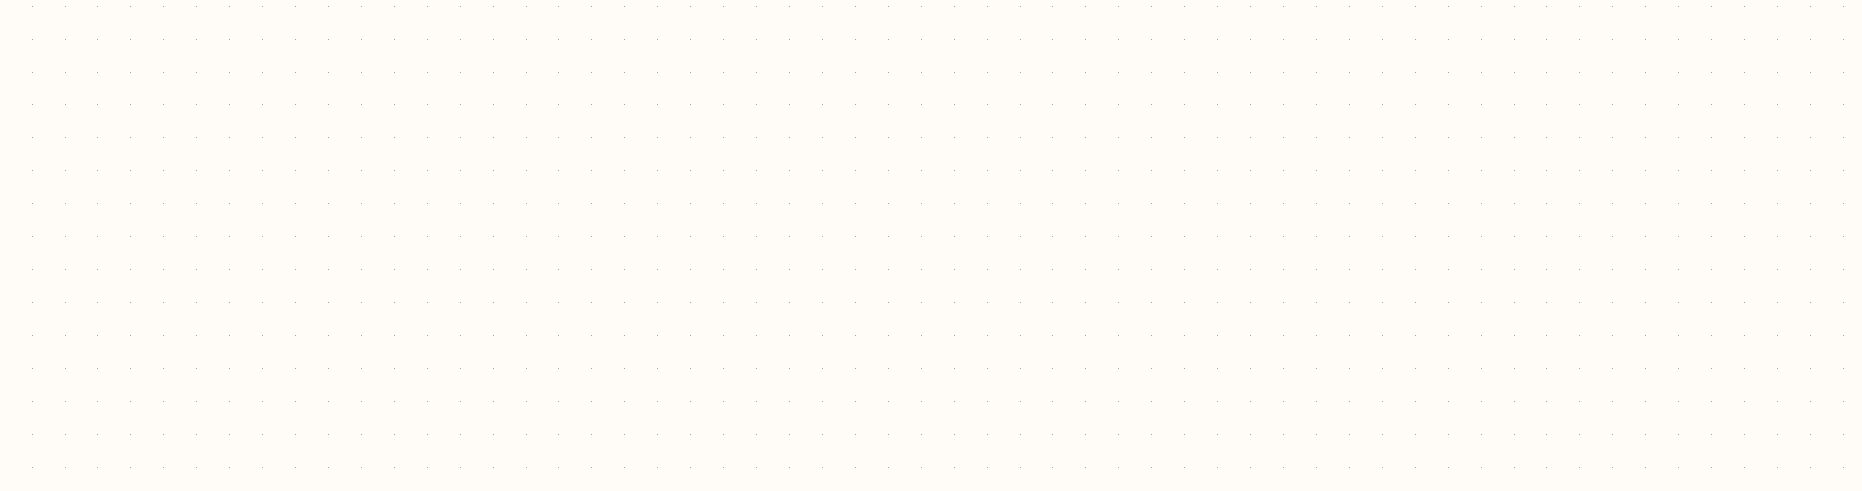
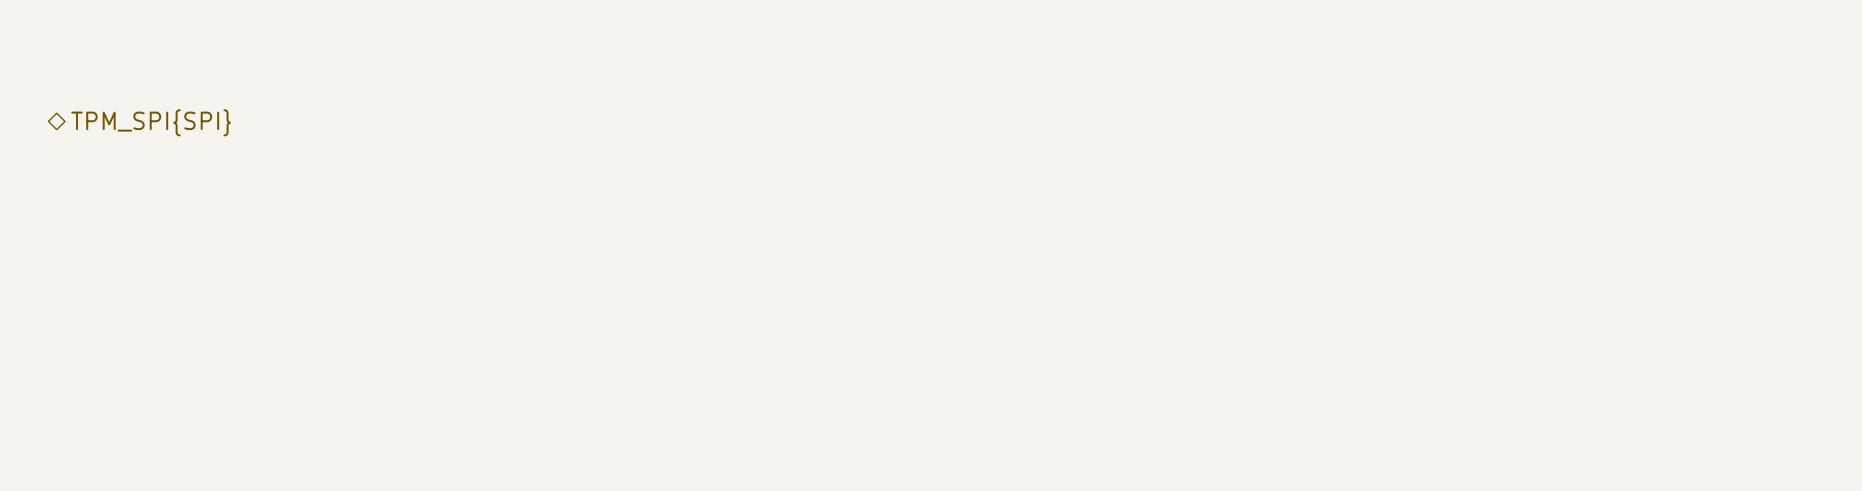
hierarchical label: none -> TPM_SPI{SPI} (151, 122)

